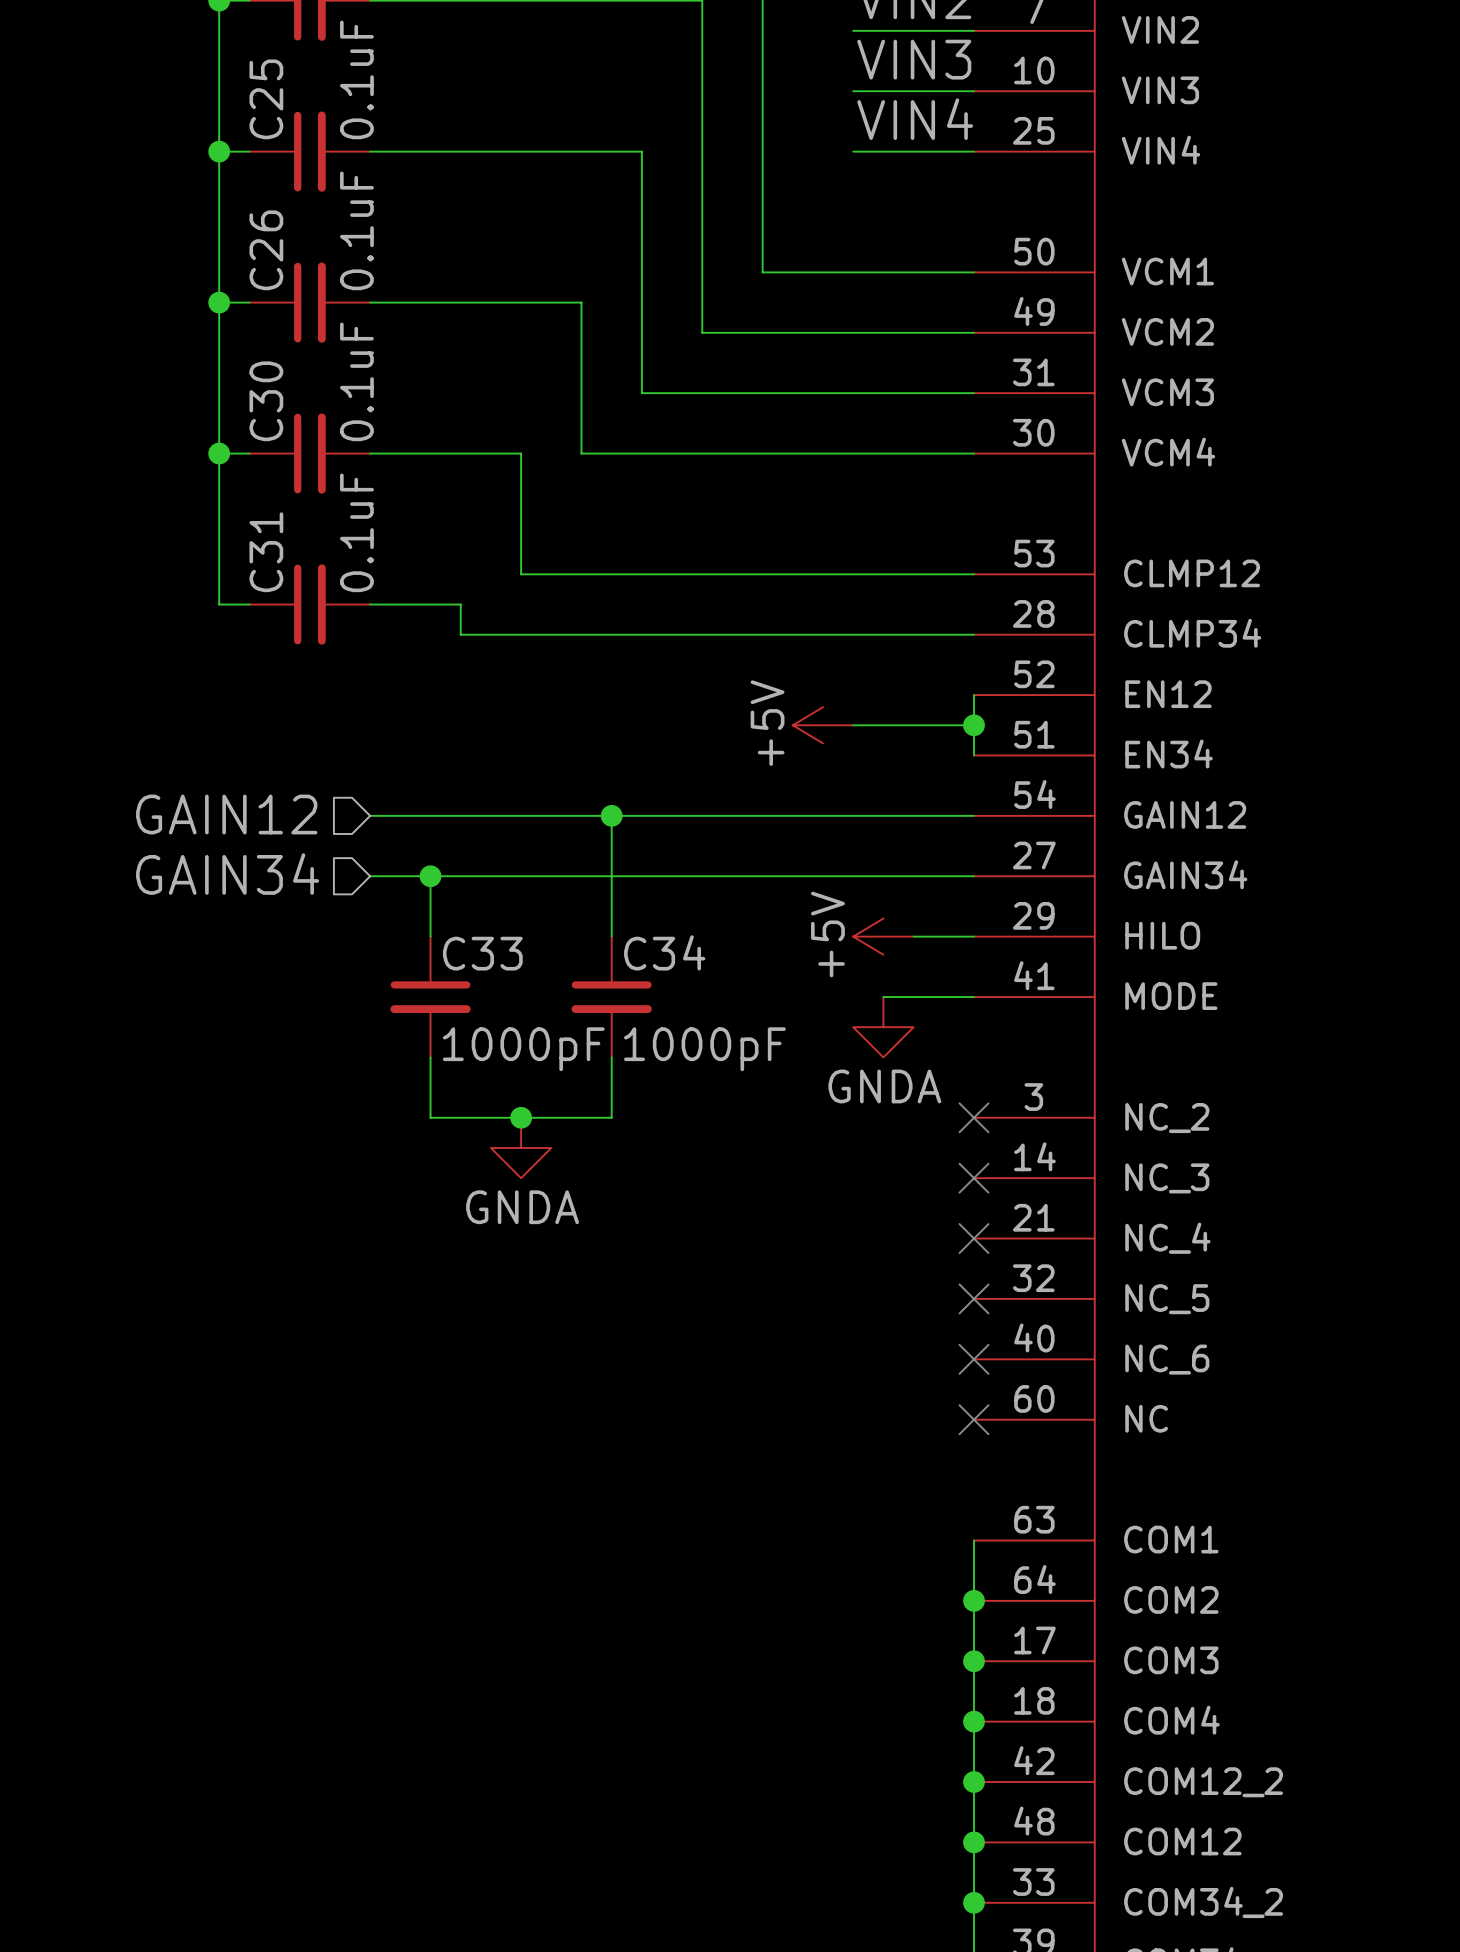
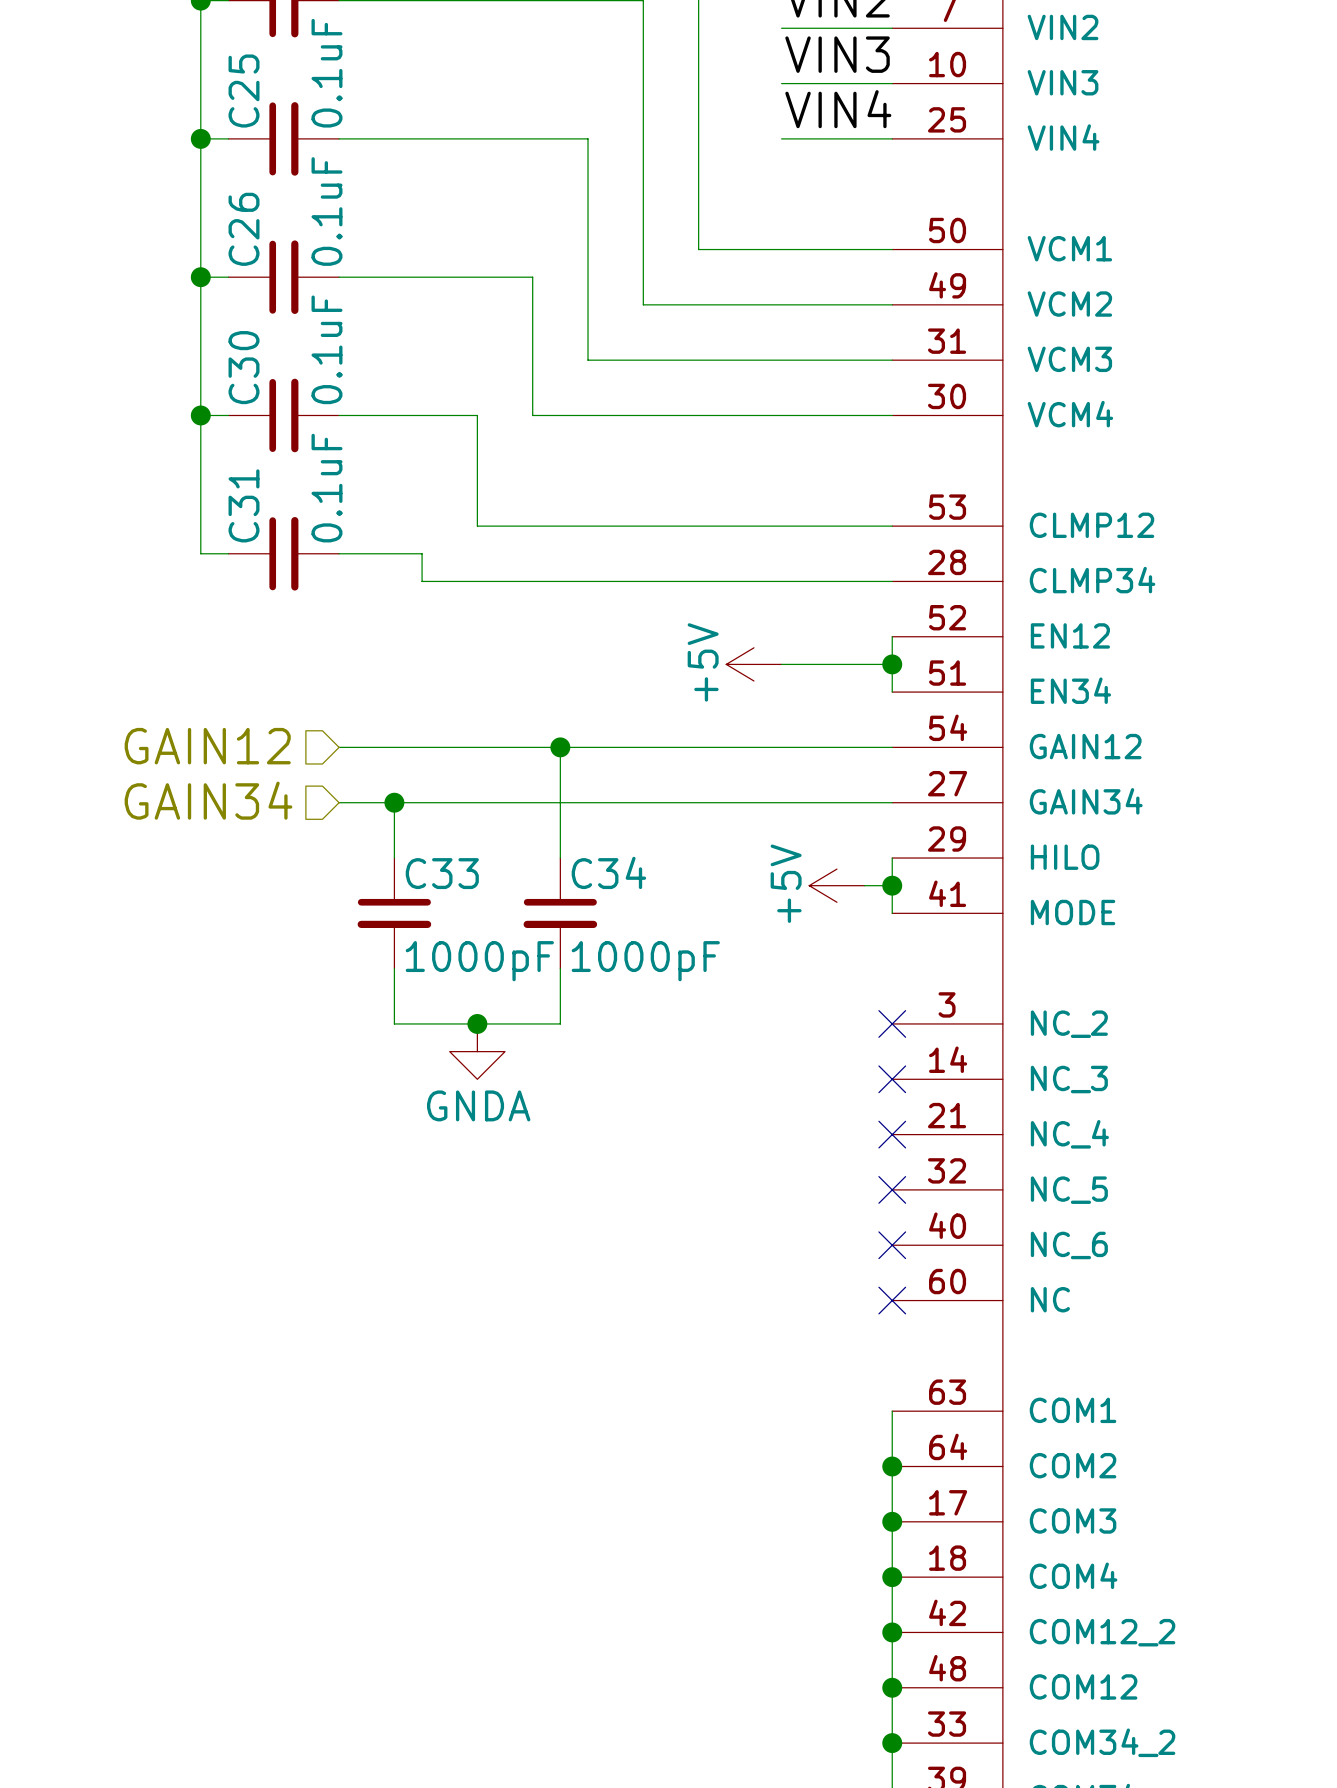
power symbol position: +5V (883, 936) -> +5V (836, 885)
wire: (913, 936) (974, 936) -> (892, 913) (892, 858)
wire: none -> (864, 885) (892, 885)
junction: none -> (892, 885)
wire: (883, 997) (974, 997) -> none
power symbol: GNDA (883, 1027) -> none

